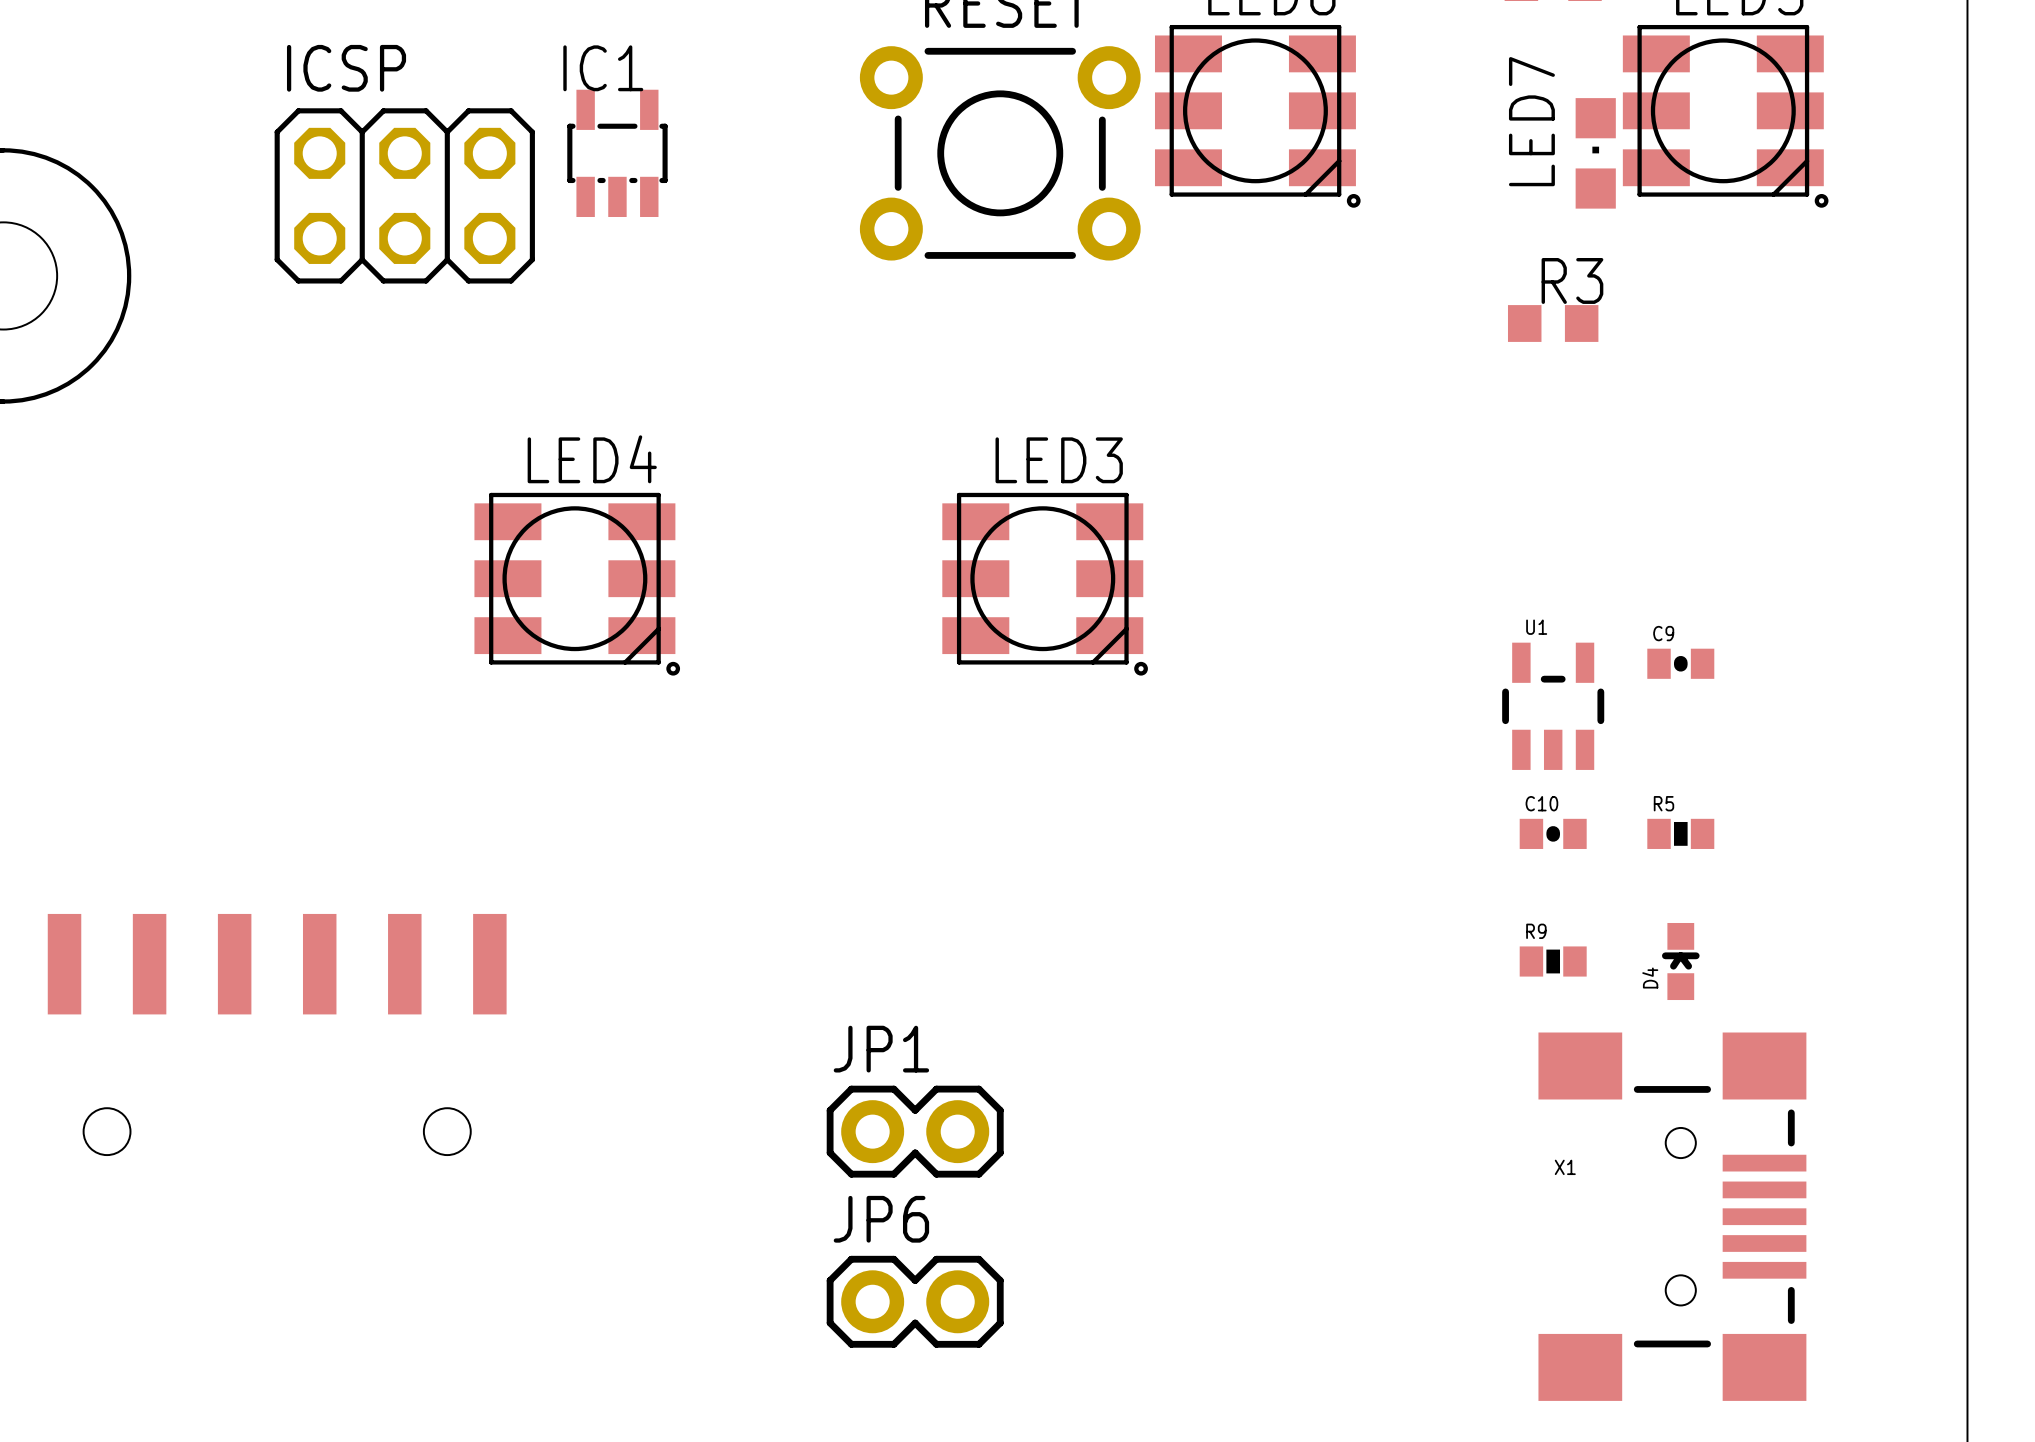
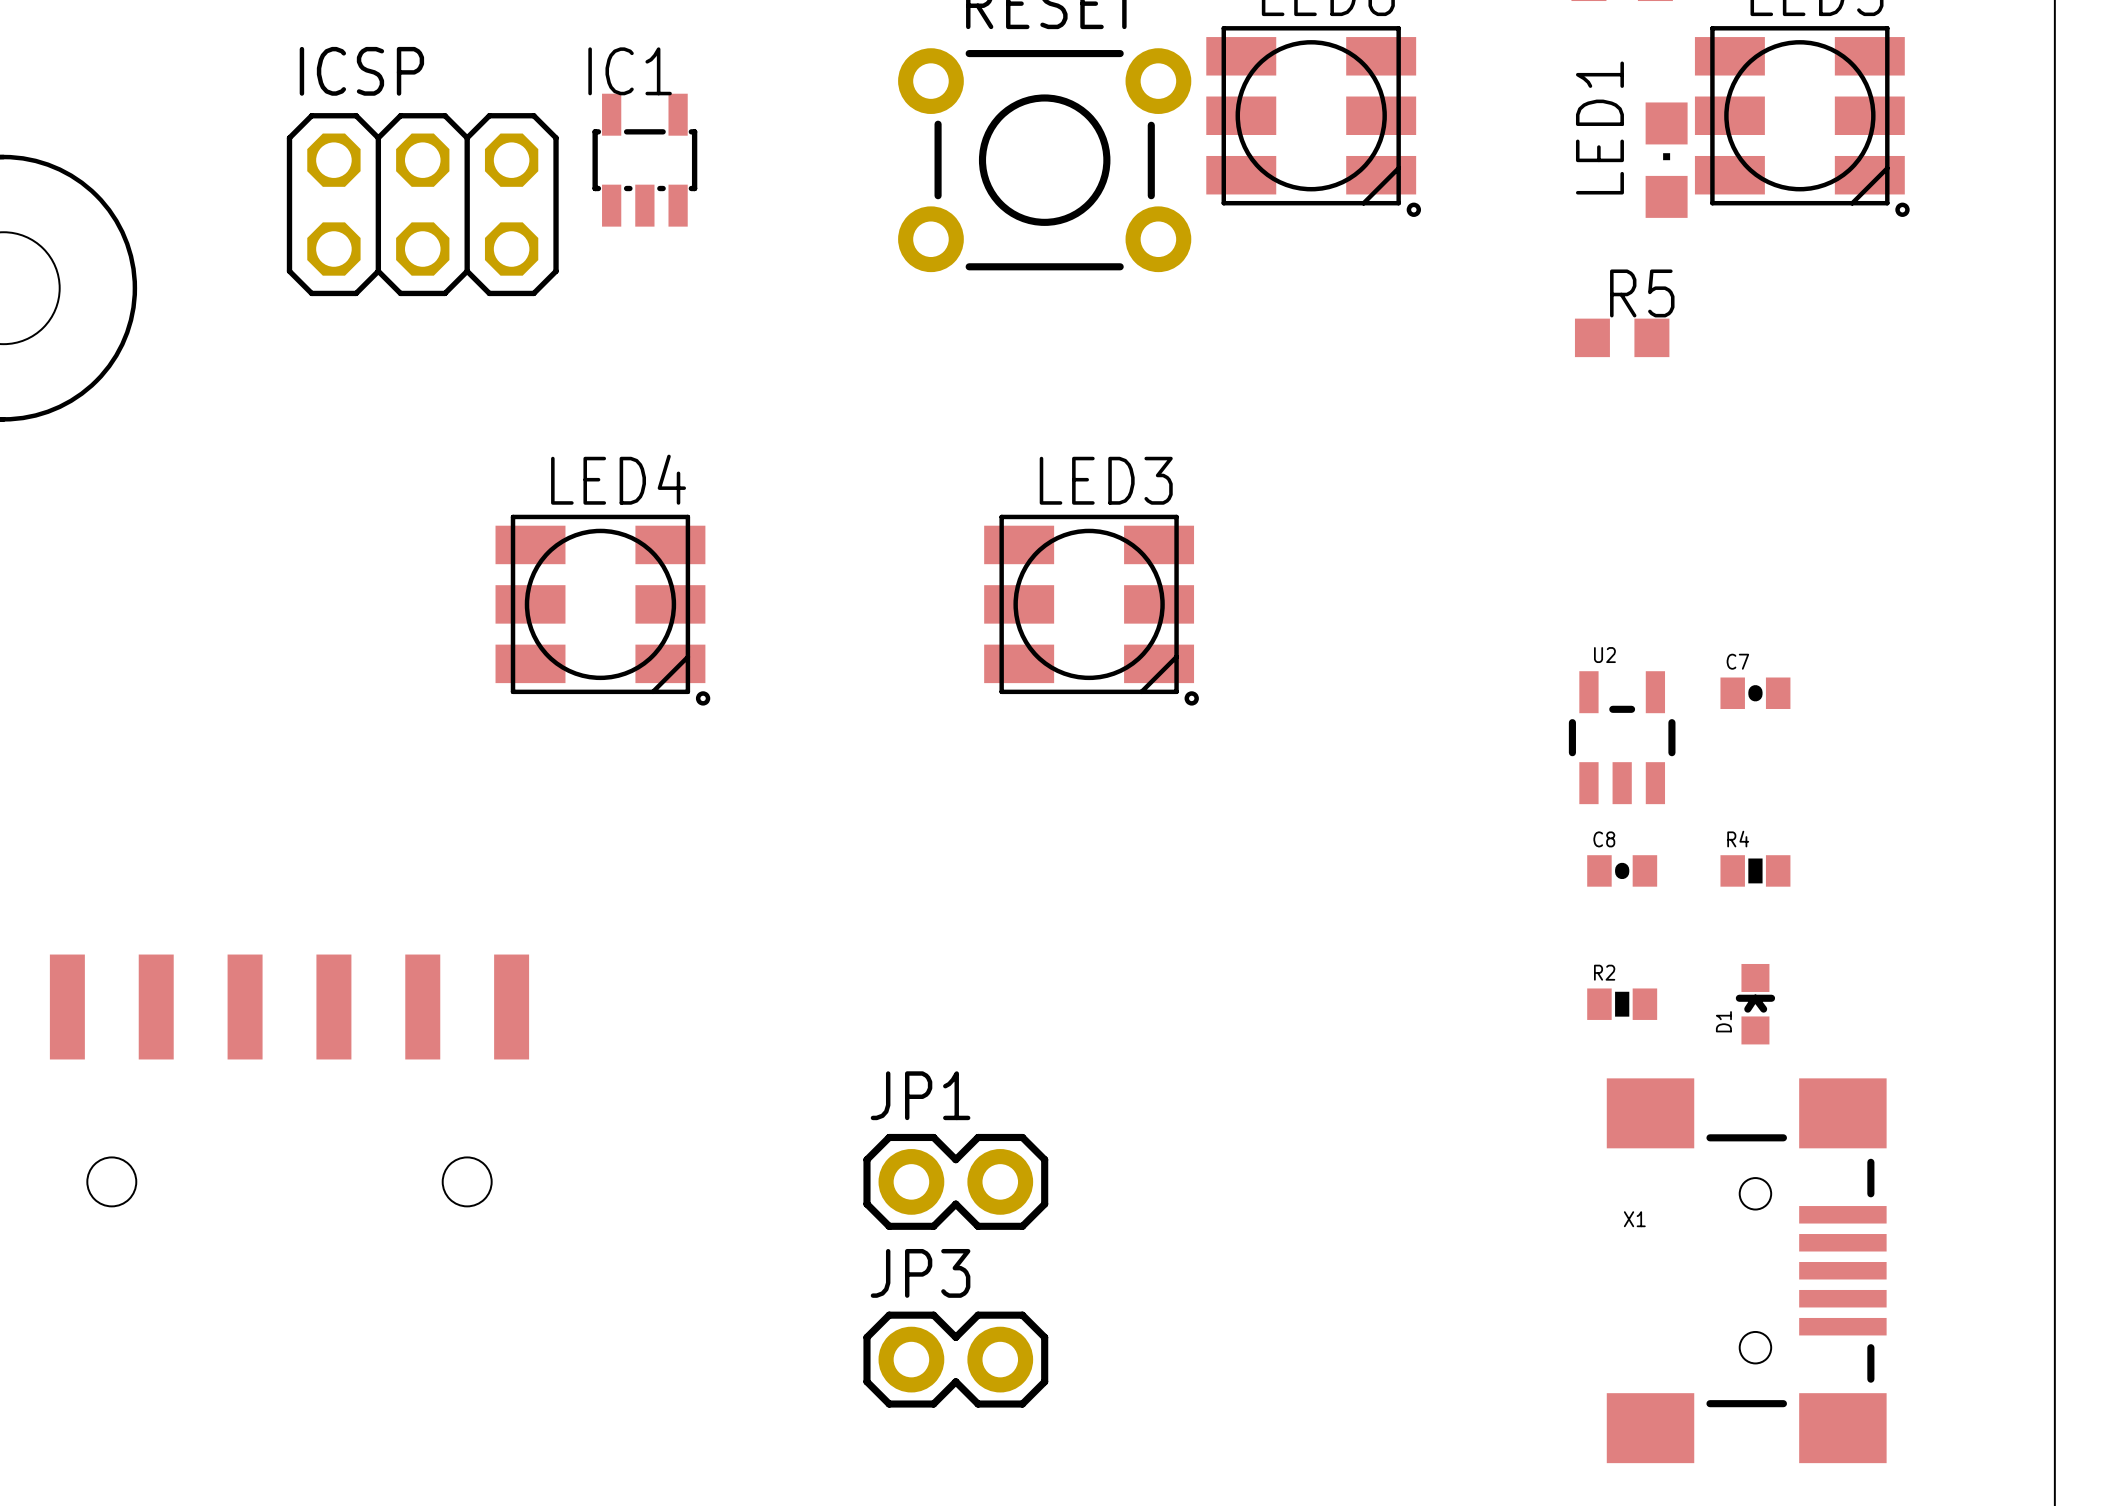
LED7 name: LED7 (1531, 121) -> LED1 (1599, 128)
R3 name: R3 (1572, 280) -> R5 (1642, 293)
U1 name: U1 (1536, 627) -> U2 (1604, 655)
C9 name: C9 (1663, 633) -> C7 (1737, 661)
C10 name: C10 (1541, 803) -> C8 (1604, 839)
R5 name: R5 (1663, 803) -> R4 (1738, 839)
R9 name: R9 (1536, 931) -> R2 (1604, 972)
D4 name: D4 (1650, 978) -> D1 (1723, 1021)
JP6 name: JP6 (881, 1219) -> JP3 (920, 1273)

